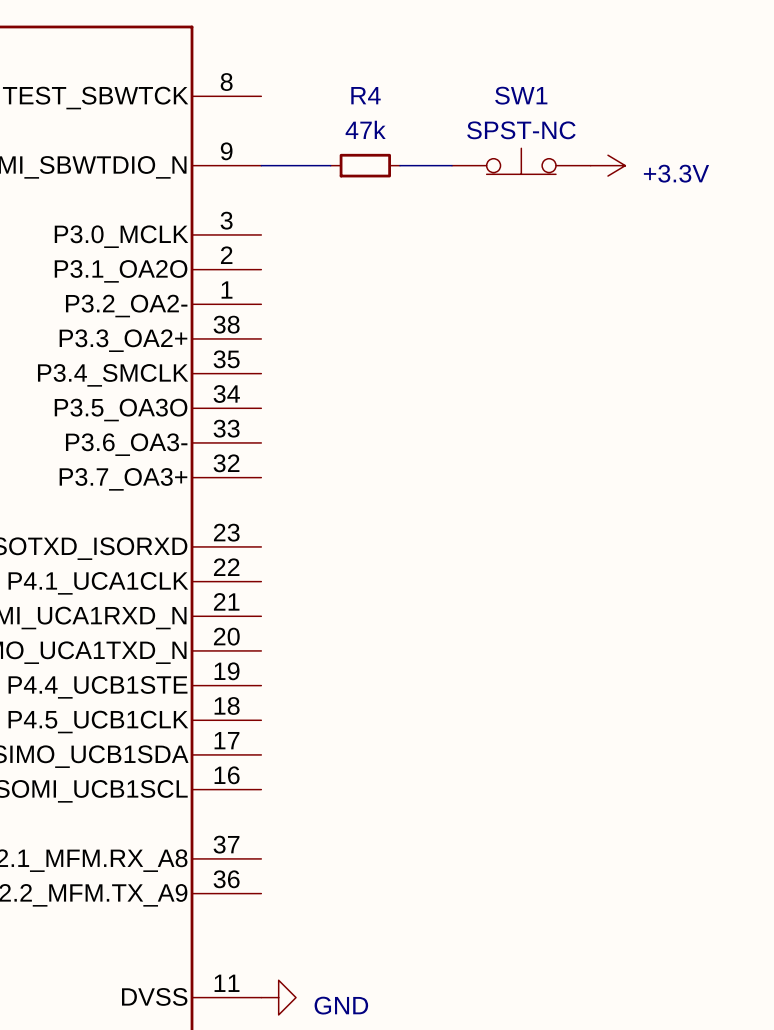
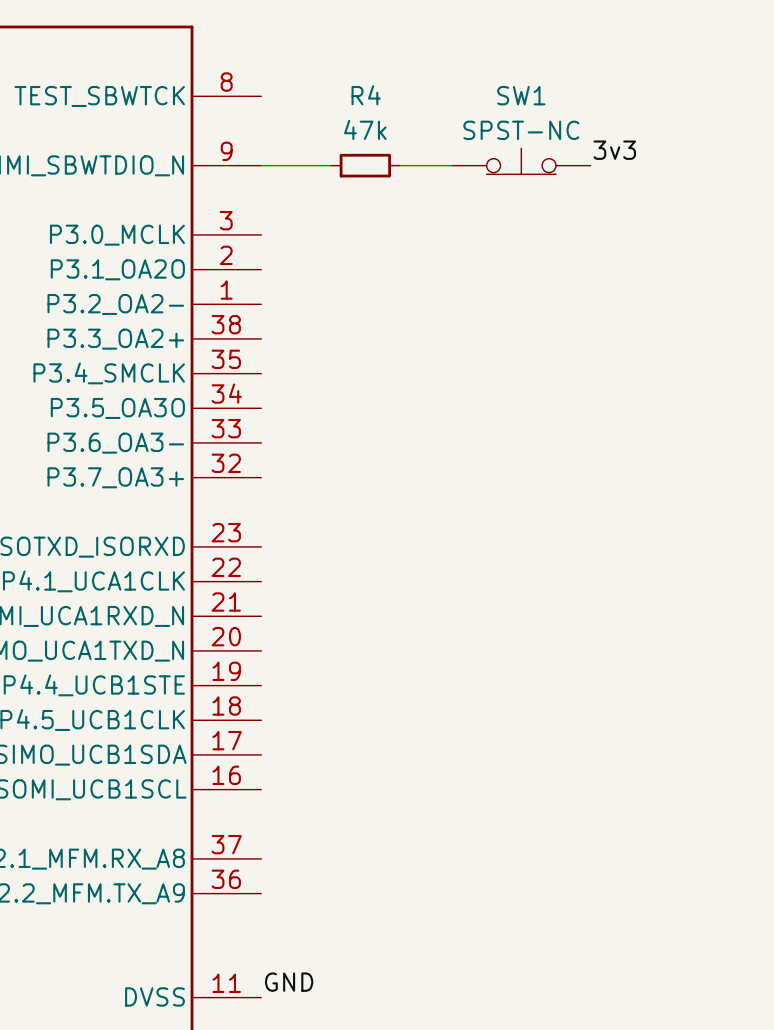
label: none -> 3v3 (614, 150)
power symbol: +3.3V (607, 165) -> none
label: none -> GND (289, 982)
power symbol: GND (278, 997) -> none

